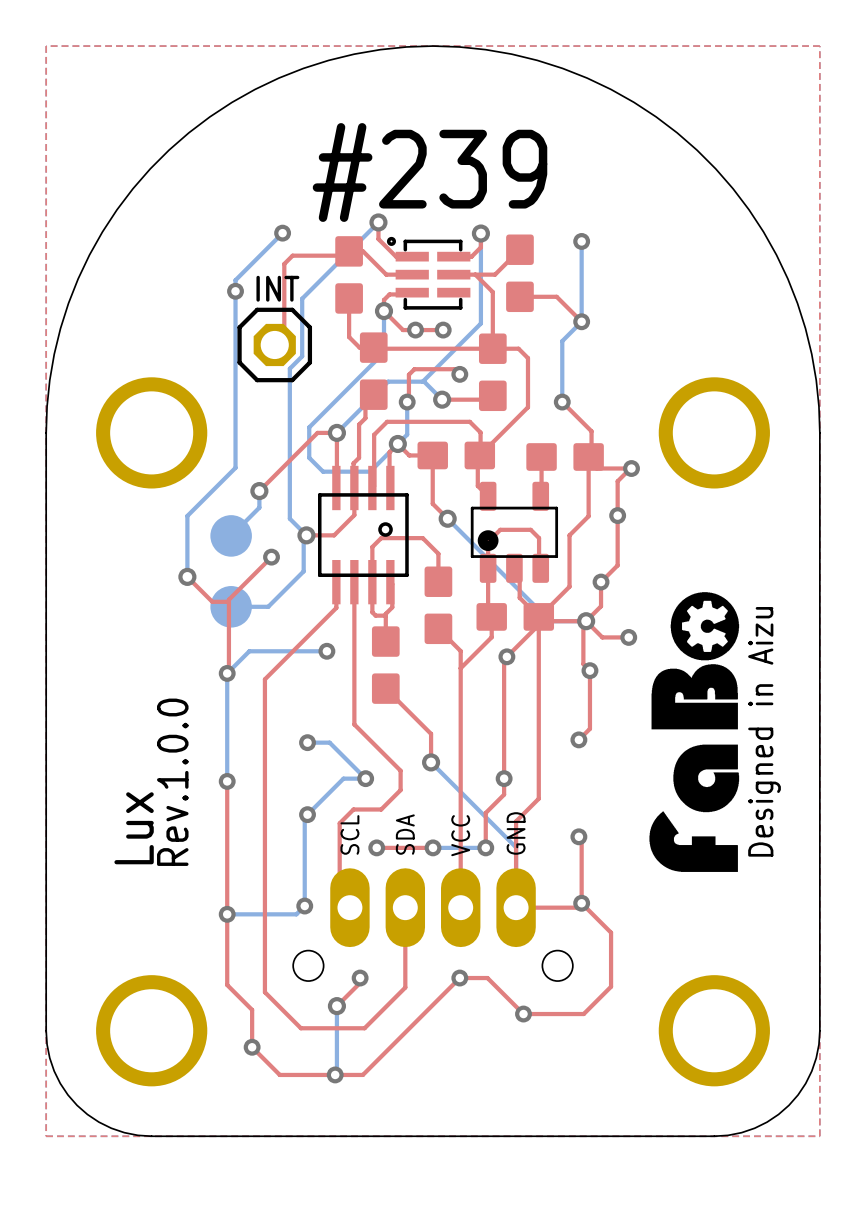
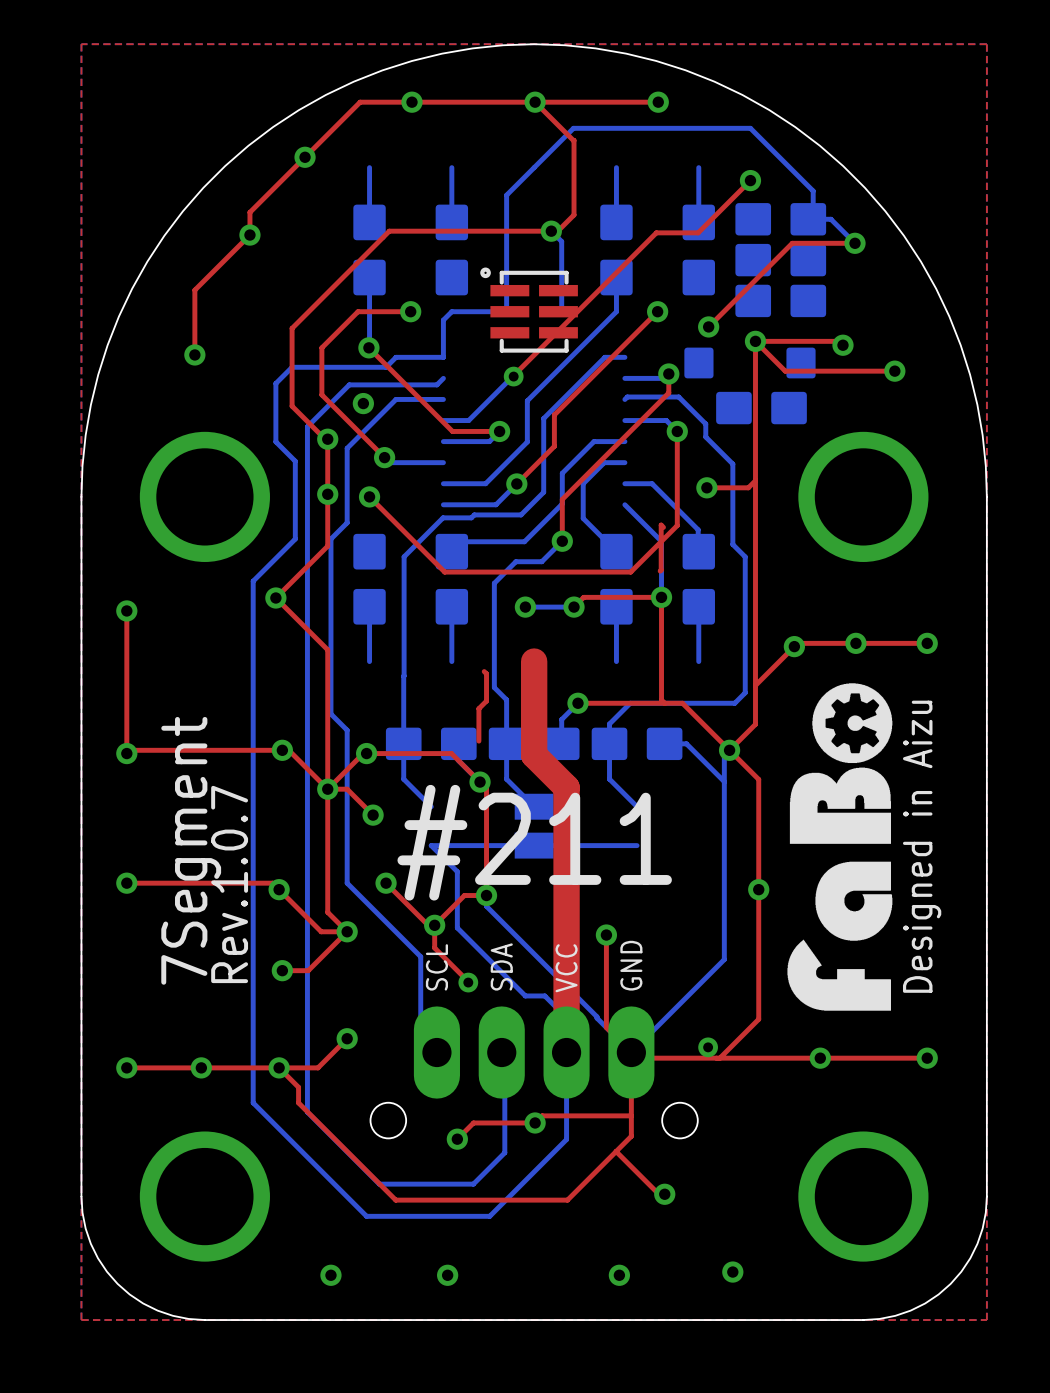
via: none -> (411, 102)
top track: none -> (535, 102) (573, 140)
via: none -> (535, 102)
top track: none -> (658, 102) (360, 102) (249, 212) (249, 235) (194, 290) (194, 354)
via: none -> (658, 102)
top track: none -> (574, 140) (574, 214) (557, 231) (389, 231) (292, 328) (292, 406) (325, 439) (327, 439) (327, 546) (275, 598) (327, 649) (327, 912) (347, 931)
via: none -> (305, 157)
bottom track: none -> (369, 167) (369, 222)
bottom track: none -> (451, 167) (451, 222)
bottom track: none -> (616, 167) (616, 222)
bottom track: none -> (698, 167) (698, 222)
top track: none -> (750, 180) (698, 232) (656, 232) (510, 379)
via: none -> (750, 180)
text: #239 (430, 172) -> none
bottom track: none -> (808, 219) (830, 219) (855, 243)
bottom track: none -> (813, 219) (813, 191) (750, 128) (573, 128) (506, 195) (506, 311) (451, 311) (443, 320) (443, 357) (396, 357) (386, 367) (292, 367) (275, 383) (275, 441) (295, 461) (295, 539) (253, 581) (253, 1102) (366, 1216) (489, 1216) (566, 1139) (566, 1017) (544, 995) (525, 995) (457, 927) (457, 871) (431, 845) (637, 845)
bottom track: none -> (551, 231) (561, 241) (561, 311)
via: none -> (551, 231)
via: none -> (249, 235)
top track: none -> (855, 243) (792, 243) (708, 326)
via: none -> (855, 243)
part: none -> (369, 249)
part: none -> (451, 249)
part: none -> (616, 249)
part: none -> (698, 249)
top track: (378, 222) (378, 239) (396, 256) (412, 256) -> none
bottom track: (378, 222) (302, 298) (302, 356) (289, 368) (289, 518) (306, 535) -> none
via: (378, 222) -> none
part: none -> (780, 260)
bottom track: (282, 233) (235, 280) (235, 467) (187, 515) (187, 576) -> none
via: (282, 233) -> none
top track: (480, 233) (480, 247) (471, 256) (453, 256) -> none
bottom track: (480, 233) (480, 323) (422, 381) -> none
via: (480, 233) -> none
bottom track: (581, 241) (581, 321) (562, 341) (562, 402) -> none
via: (581, 241) -> none
bottom track: none -> (369, 277) (368, 347)
bottom track: none -> (616, 277) (616, 311) (527, 400) (527, 441) (485, 483) (443, 483)
top track: (519, 249) (495, 274) (453, 274) -> none
part: (519, 273) -> none
top track: none -> (410, 311) (358, 311) (321, 347) (321, 394) (384, 457)
via: none -> (410, 311)
part side: top (349, 274) -> bottom (780, 219)
top track: (412, 274) (386, 274) (363, 251) (349, 251) (344, 255) (292, 255) (284, 263) (284, 335) (274, 344) -> none
top track: (475, 274) (492, 292) (492, 348) -> none
top track: none -> (657, 311) (554, 414) (554, 446) (516, 483)
via: none -> (657, 311)
via: none -> (708, 326)
text: INT (277, 288) -> none
via: (235, 291) -> none
top track: (412, 292) (410, 294) (389, 294) (384, 299) (384, 311) (402, 330) (443, 330) -> none
top track: (519, 296) (556, 296) (581, 321) -> none
top track: (349, 298) (349, 337) (359, 347) (518, 348) (527, 358) (527, 407) (471, 463) -> none
top track: none -> (755, 341) (755, 724) (729, 750)
top track: none -> (755, 341) (785, 371) (894, 371)
top track: none -> (755, 341) (839, 341) (842, 345)
via: none -> (755, 341)
via: none -> (842, 345)
top track: none -> (368, 347) (452, 431) (499, 431)
via: none -> (368, 347)
via: none -> (194, 354)
bottom track: (384, 311) (384, 352) (309, 427) (309, 457) (323, 471) (370, 471) (407, 434) (407, 402) -> none
via: (384, 311) -> none
bottom track: none -> (624, 357) (604, 357) (543, 418) (543, 492) (521, 514) (474, 514) (471, 517) (443, 517) (404, 556) (404, 675)
part: none -> (749, 362)
via: (581, 321) -> none
via: none -> (894, 371)
top track: none -> (668, 373) (668, 392) (562, 499) (562, 541)
bottom track: none -> (668, 373) (664, 378) (624, 378)
via: none -> (668, 373)
via: (443, 330) -> none
bottom track: none -> (443, 378) (436, 384) (349, 384) (307, 426) (307, 1112) (379, 1184) (473, 1184) (504, 1152) (504, 1055) (501, 1052)
bottom track: none -> (510, 379) (468, 420) (443, 420)
part: (274, 344) -> none
bottom track: none -> (443, 399) (396, 399) (347, 448) (347, 522) (330, 539) (330, 564)
bottom track: none -> (624, 399) (627, 397) (678, 397) (705, 424) (705, 436) (732, 464) (732, 544) (745, 556) (745, 692) (734, 703) (630, 703) (609, 724) (609, 779) (637, 806)
via: none -> (363, 403)
part: none -> (761, 408)
bottom track: none -> (624, 420) (666, 420) (677, 431)
part side: top (373, 371) -> bottom (431, 743)
part side: top (492, 372) -> bottom (534, 743)
top track: (459, 374) (454, 369) (414, 369) (408, 374) (408, 400) (407, 402) -> none
via: (459, 374) -> none
bottom track: none -> (499, 431) (489, 441) (443, 441)
via: none -> (499, 431)
top track: none -> (677, 431) (677, 525) (630, 572) (444, 572) (369, 496)
via: none -> (677, 431)
via: none -> (327, 439)
bottom track: none -> (624, 441) (594, 441) (562, 473) (562, 503) (524, 541) (461, 541) (451, 551)
top track: (373, 394) (365, 403) (365, 418) (359, 424) (359, 457) (353, 463) (354, 515) (334, 535) (306, 535) -> none
top track: (492, 395) (488, 399) (442, 399) -> none
bottom track: none -> (384, 457) (389, 462) (443, 462)
via: none -> (384, 457)
bottom track: (442, 399) (424, 381) (388, 381) (336, 432) -> none
via: (442, 399) -> none
via: (407, 402) -> none
top track: (562, 402) (591, 431) (591, 463) -> none
via: (562, 402) -> none
bottom track: none -> (624, 462) (604, 462) (583, 483) (583, 518) (616, 551)
top track: none -> (755, 480) (748, 487) (706, 487)
bottom track: none -> (516, 483) (495, 504) (443, 504)
via: none -> (516, 483)
bottom track: none -> (624, 483) (652, 483) (698, 529) (698, 551)
via: none -> (706, 487)
via: none -> (327, 494)
via: none -> (369, 496)
via: (336, 432) -> none
bottom track: none -> (624, 504) (661, 541) (661, 597)
via: (397, 443) -> none
top track: (480, 454) (480, 432) (469, 421) (387, 421) (374, 434) (374, 486) (372, 488) -> none
part: (456, 455) -> none
part: (565, 456) -> none
top track: (588, 456) (588, 516) (569, 535) (569, 586) (539, 617) (519, 597) (519, 573) (514, 568) -> none
top track: (477, 457) (477, 486) (488, 496) -> none
top track: (588, 460) (596, 468) (631, 468) -> none
top track: (630, 468) (617, 481) (617, 565) (601, 582) (601, 606) (586, 621) -> none
via: (631, 468) -> none
bottom track: none -> (562, 541) (541, 561) (515, 561) (494, 583) (494, 687) (506, 699) (506, 779) (534, 806)
via: none -> (562, 541)
top track: (336, 488) (336, 432) (317, 432) (259, 491) -> none
top track: (390, 488) (389, 452) (397, 443) (409, 455) (432, 455) (432, 503) (447, 518) -> none
via: (259, 491) -> none
part: none -> (369, 579)
part: none -> (451, 579)
part: none -> (616, 579)
part: none -> (698, 579)
bottom track: (259, 507) (231, 535) -> (330, 584) (330, 714) (347, 730) (347, 883) (420, 956) (420, 1036) (436, 1052)
via: (617, 515) -> none
bottom track: (447, 518) (550, 621) (586, 621) -> none
via: (447, 518) -> none
via: none -> (661, 597)
via: none -> (275, 598)
bottom track: none -> (369, 606) (369, 661)
bottom track: none -> (451, 606) (451, 661)
bottom track: none -> (616, 606) (616, 661)
bottom track: none -> (698, 606) (698, 661)
bottom track: none -> (525, 607) (574, 607)
via: none -> (525, 607)
top track: none -> (574, 607) (583, 597) (661, 597) (661, 700) (664, 703)
via: none -> (574, 607)
top track: none -> (126, 610) (126, 753) (130, 750) (288, 750) (327, 789)
via: none -> (126, 610)
bottom track: (303, 532) (303, 571) (268, 606) (231, 606) -> none
part: (514, 532) -> none
part: (231, 535) -> none
via: (306, 535) -> none
part: (363, 535) -> none
top track: (271, 557) (228, 599) (228, 671) (227, 673) -> none
via: (271, 557) -> none
via: none -> (855, 643)
top track: none -> (927, 643) (797, 643) (755, 685)
via: none -> (927, 643)
via: none -> (794, 646)
top track: (540, 568) (539, 566) (539, 538) (530, 529) (500, 529) (488, 542) (488, 613) (491, 616) (491, 637) (460, 668) -> none
top track: (187, 576) (212, 601) (228, 601) -> none
via: (187, 576) -> none
top track: (438, 581) (438, 553) (422, 538) (381, 538) (372, 546) (372, 612) (375, 615) (385, 615) -> none
top track: (336, 582) (336, 607) (264, 679) (264, 992) (300, 1028) (364, 1028) (405, 987) (405, 907) -> none
top track: (354, 582) (354, 724) (400, 770) (400, 790) (381, 809) (353, 809) (339, 823) (339, 897) (349, 907) (354, 903) -> none
via: (601, 582) -> none
bottom track: none -> (403, 676) (403, 779) (431, 806)
part: (438, 605) -> none
part: (231, 606) -> none
top track: none -> (577, 703) (682, 703) (758, 779) (758, 1019) (719, 1058)
bottom track: none -> (577, 703) (561, 719) (561, 743)
via: none -> (577, 703)
top track: (536, 615) (536, 626) (504, 659) (504, 794) (485, 812) (485, 847) -> none
part side: top (515, 616) -> bottom (637, 743)
top track: (538, 616) (538, 798) (516, 821) (516, 907) (577, 907) (581, 903) -> none
top track: (583, 621) (583, 664) (589, 670) (589, 728) (578, 739) -> none
top track: (586, 621) (541, 621) (538, 623) -> none
top track: (586, 621) (602, 637) (628, 637) -> none
via position: (586, 621) -> (729, 750)
top track: (438, 628) (460, 651) (460, 681) -> (534, 661) (534, 755) (566, 787)
via: (628, 637) -> none
bottom track: none -> (664, 743) (686, 743) (724, 781)
via: none -> (282, 750)
bottom track: none -> (729, 750) (724, 755) (724, 959) (631, 1052) (486, 906) (486, 895)
bottom track: (326, 651) (249, 651) (227, 673) (227, 781) -> none
via: (326, 651) -> none
via: none -> (126, 753)
via: none -> (366, 753)
via: (506, 656) -> none
part side: top (385, 665) -> bottom (780, 300)
via: (589, 670) -> none
via: (227, 673) -> none
via: none -> (480, 782)
top track width: thin (460, 681) (460, 907) -> thick (566, 787) (566, 1052)
top track: none -> (327, 789) (363, 753) (451, 753) (486, 788) (486, 895) (464, 895) (434, 925)
top track: none -> (327, 789) (347, 789) (373, 815)
via: none -> (327, 789)
top track: (385, 688) (431, 733) (431, 762) -> none
via: none -> (373, 815)
part: none -> (534, 826)
text: none -> #211 (534, 842)
via: (578, 739) -> none
bottom track: (307, 742) (329, 742) (365, 778) (343, 778) (304, 817) (304, 906) (296, 914) (227, 914) -> none
via: (307, 742) -> none
top track: none -> (126, 883) (272, 883) (321, 931) (347, 931)
via: none -> (126, 883)
top track: none -> (386, 883) (428, 925) (434, 925)
via: none -> (386, 883)
bottom track: (431, 762) (516, 847) (516, 907) -> none
via: (431, 762) -> none
via: none -> (758, 889)
via: none -> (486, 895)
via: (365, 778) -> none
via: (504, 778) -> none
top track: (227, 781) (227, 985) (252, 1009) (252, 1047) (279, 1074) (362, 1074) (459, 978) (487, 978) (523, 1014) (583, 1014) (611, 986) (611, 932) (581, 903) -> none
via position: (227, 781) -> (279, 889)
text: Rev.1.0.0 (172, 782) -> Rev.1.0.7 (229, 884)
top track: none -> (434, 925) (434, 947) (463, 977)
via: none -> (434, 925)
top track: none -> (347, 931) (308, 970) (282, 970)
via: none -> (347, 931)
top track: none -> (606, 935) (606, 1027) (637, 1058) (927, 1058)
via: none -> (606, 935)
via: (307, 814) -> none
text: Lux (134, 828) -> 7Segment (191, 850)
top track: (578, 836) (581, 839) (581, 903) -> none
via: (578, 836) -> none
via: none -> (282, 970)
top track: (376, 847) (433, 847) -> none
bottom track: (433, 847) (485, 847) -> none
via: (433, 847) -> none
via: (485, 847) -> none
top track: none -> (347, 1038) (318, 1067) (126, 1067)
via: none -> (347, 1038)
via: (304, 906) -> none
top track: none -> (631, 1052) (631, 1136) (567, 1200) (395, 1200) (298, 1102) (298, 1087) (279, 1067)
via: none -> (820, 1058)
via: none -> (927, 1058)
via position: (227, 914) -> (279, 1067)
via: none -> (126, 1067)
via: none -> (201, 1067)
top track: none -> (631, 1115) (542, 1115) (535, 1122) (473, 1122) (457, 1139)
via: none -> (535, 1122)
top track: (360, 978) (360, 982) (336, 1006) -> none
via: (360, 978) -> none
via: (459, 978) -> none
top track: none -> (616, 1151) (658, 1194) (664, 1194)
bottom track: (336, 1006) (336, 1073) (335, 1074) -> none
via position: (336, 1006) -> (457, 1139)
via: (523, 1014) -> none
via: none -> (664, 1194)
via: (252, 1047) -> none
via: (335, 1074) -> none
via: none -> (732, 1272)
via: none -> (330, 1275)
via: none -> (447, 1275)
via: none -> (619, 1275)

